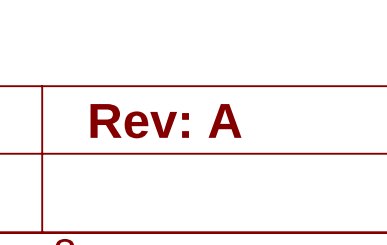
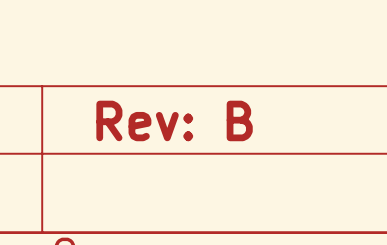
title block: Rev: A (166, 121) -> Rev: B (174, 120)

